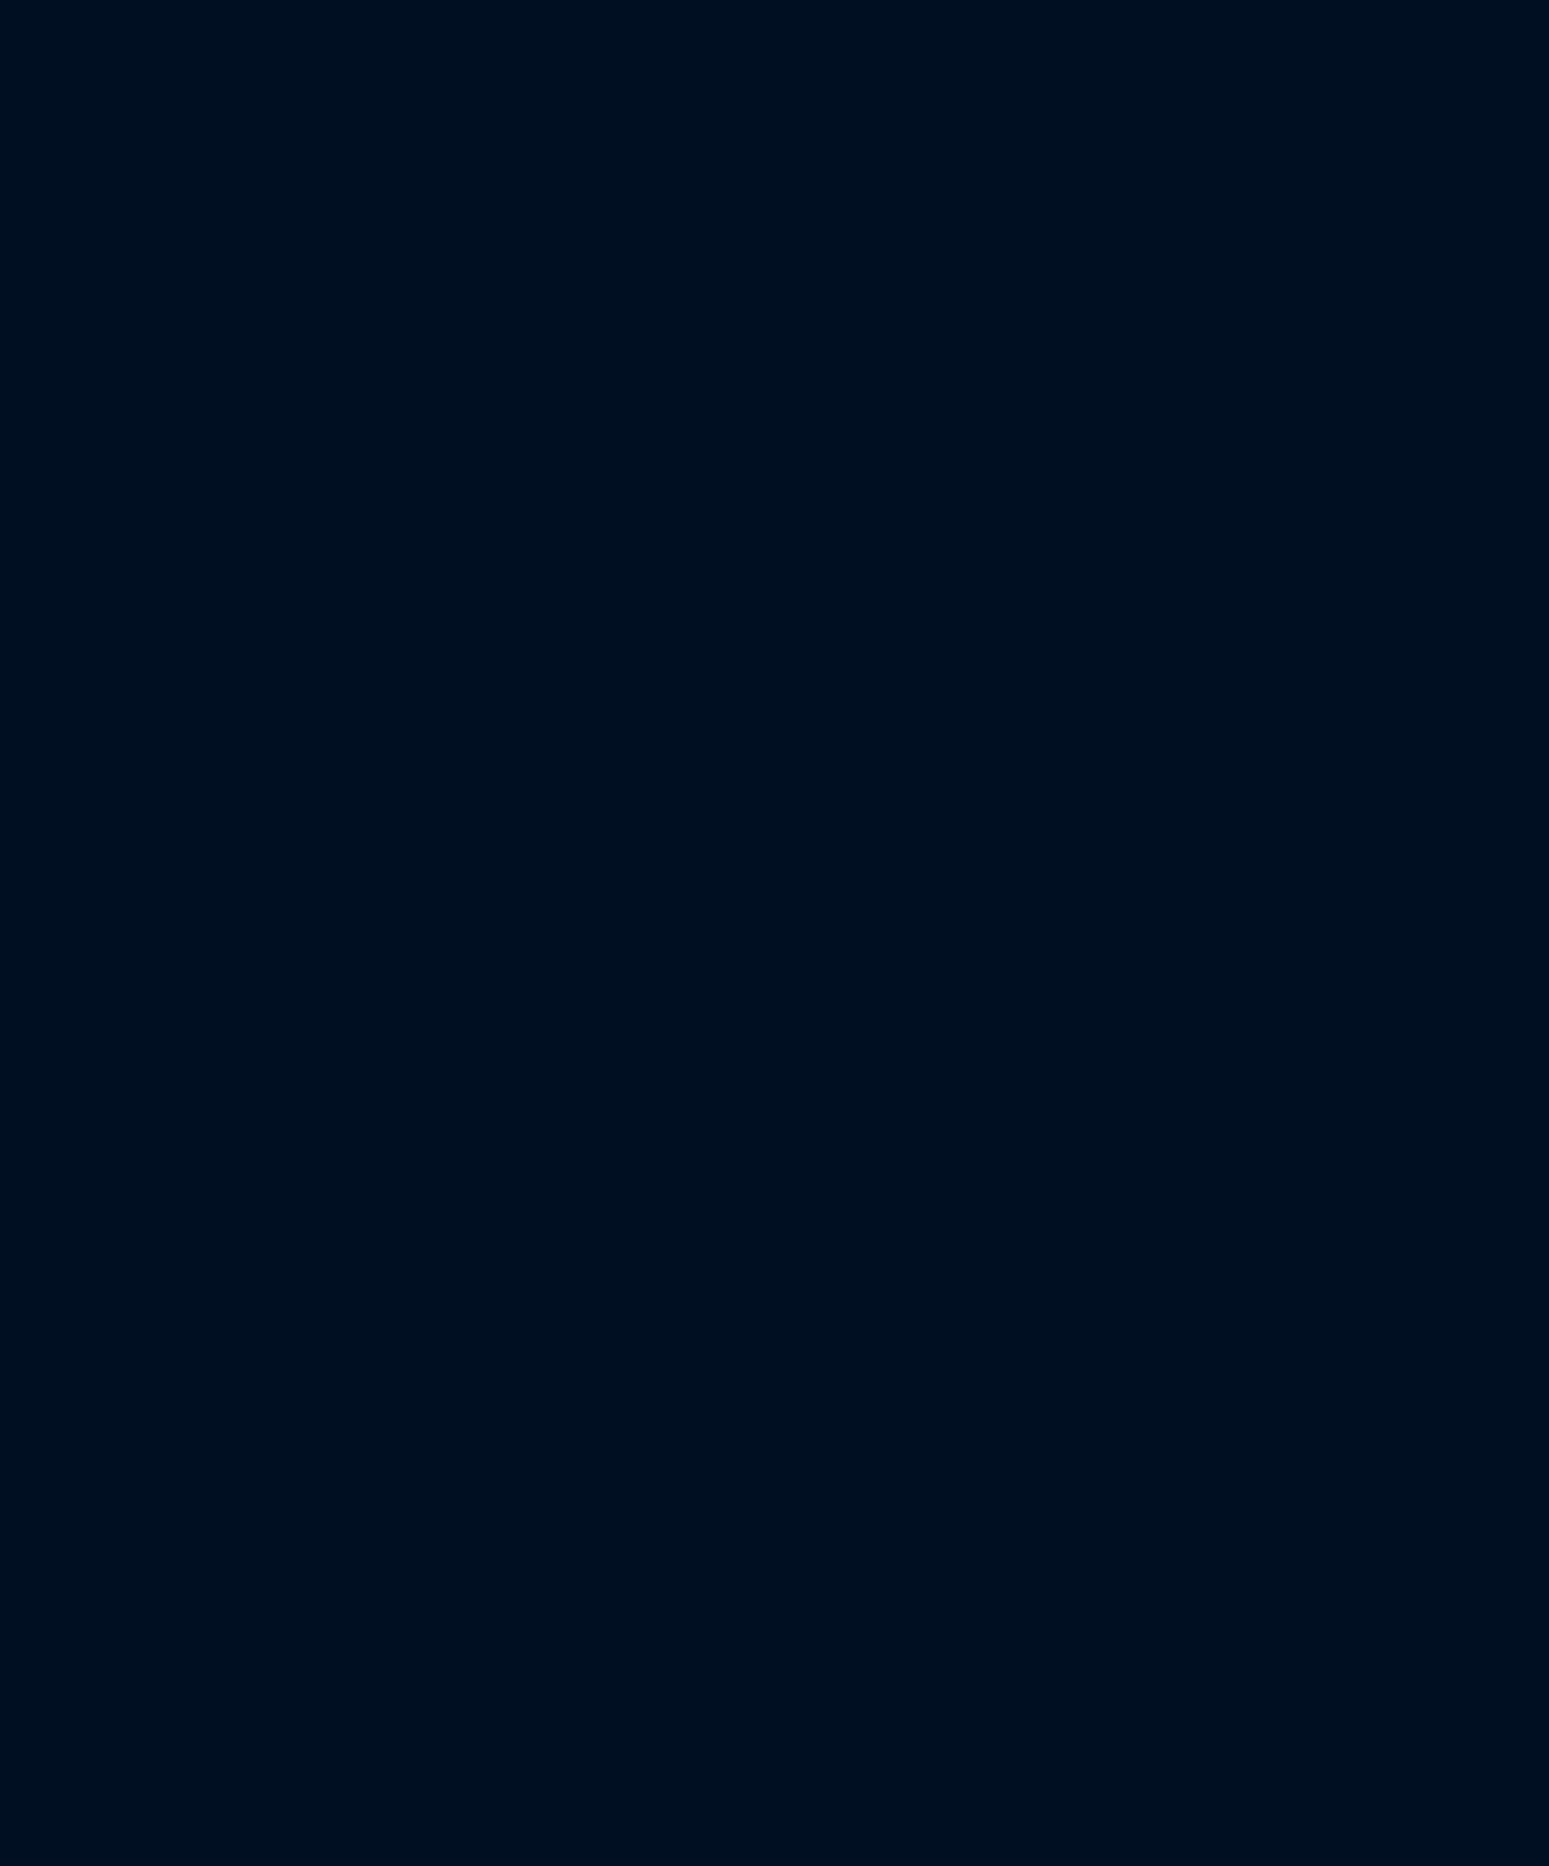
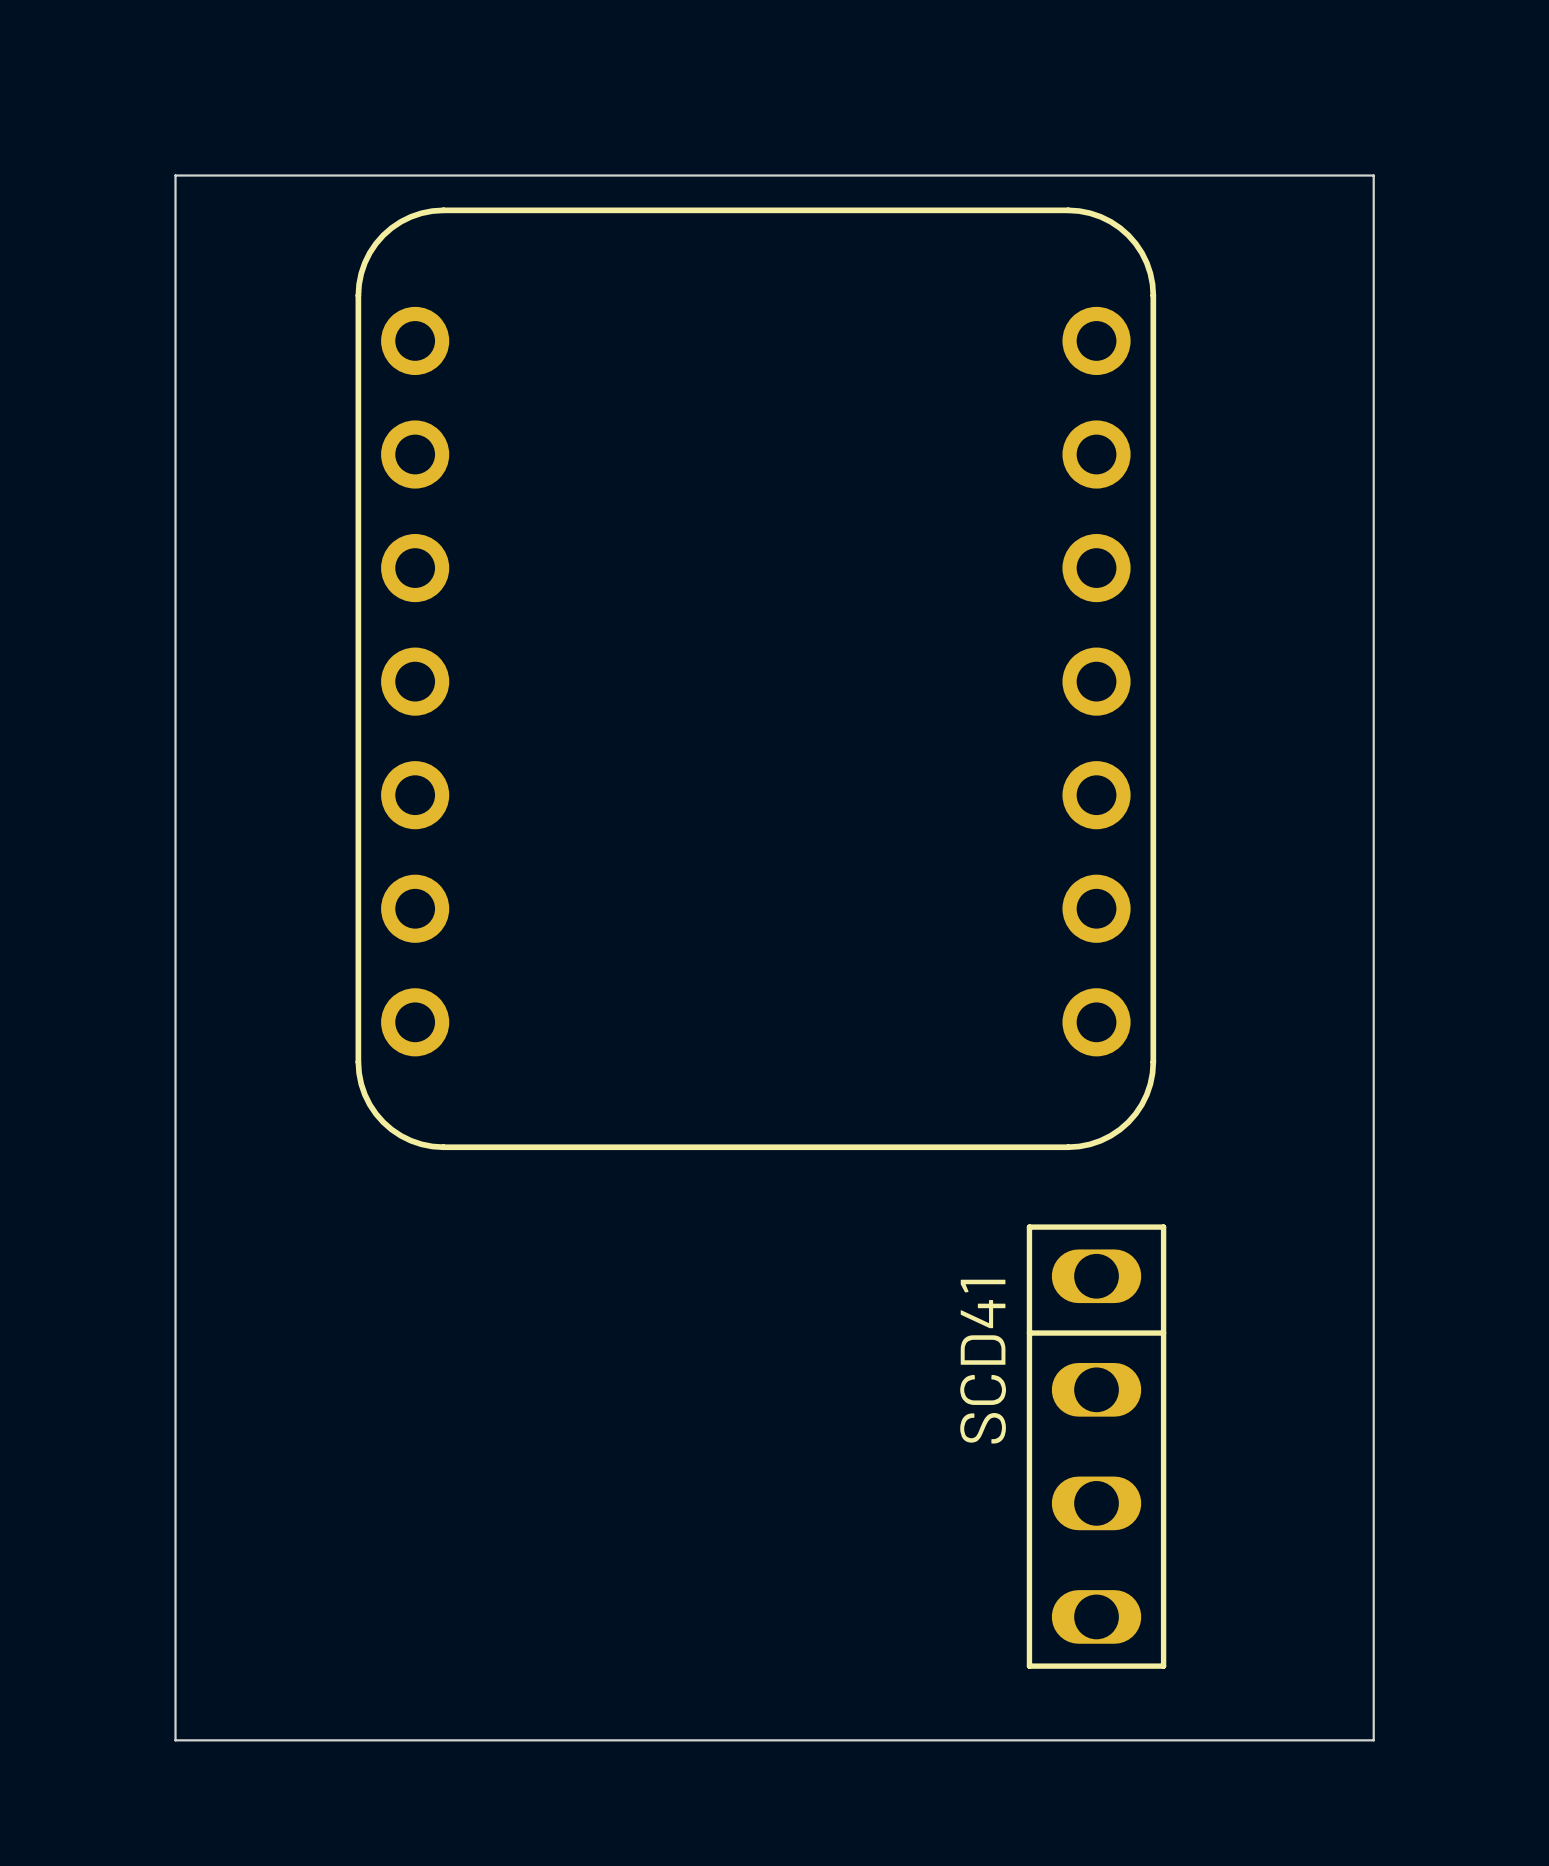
board edge: none -> (175, 175) (1373, 175) (1373, 1740) (175, 1740) (175, 175)
part: none -> (755, 678)
SCD41: none -> (1096, 1446)

